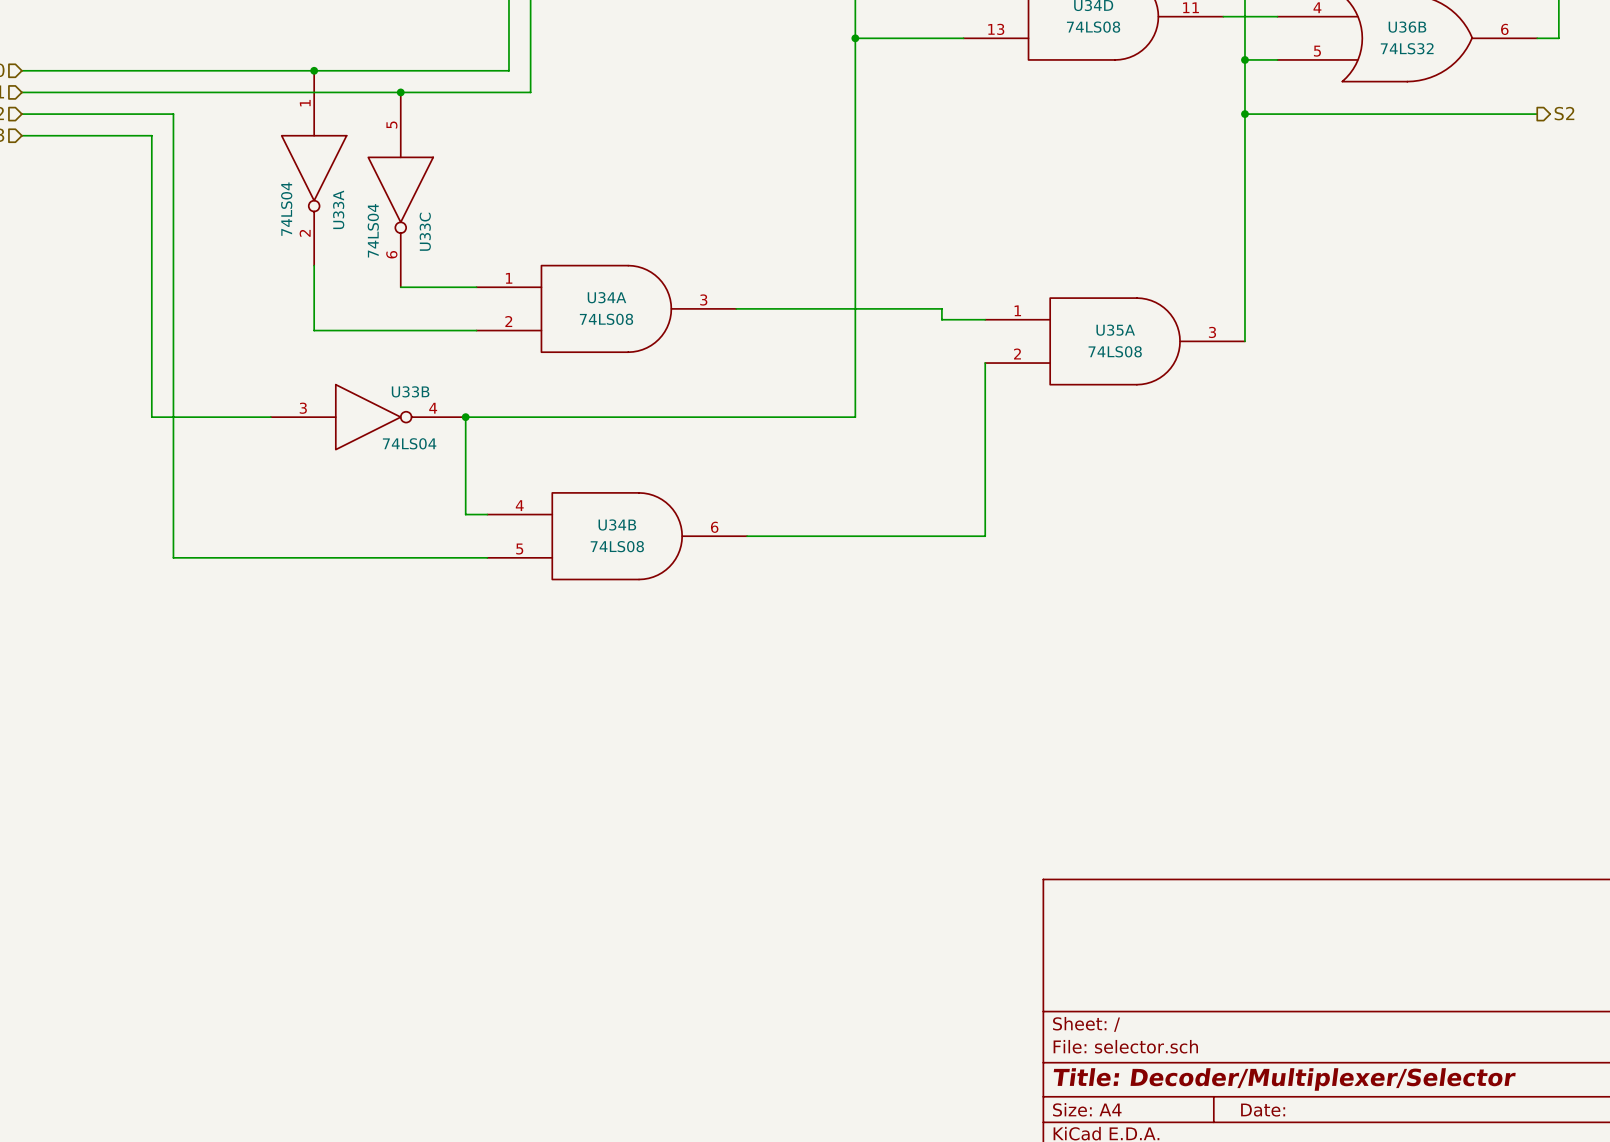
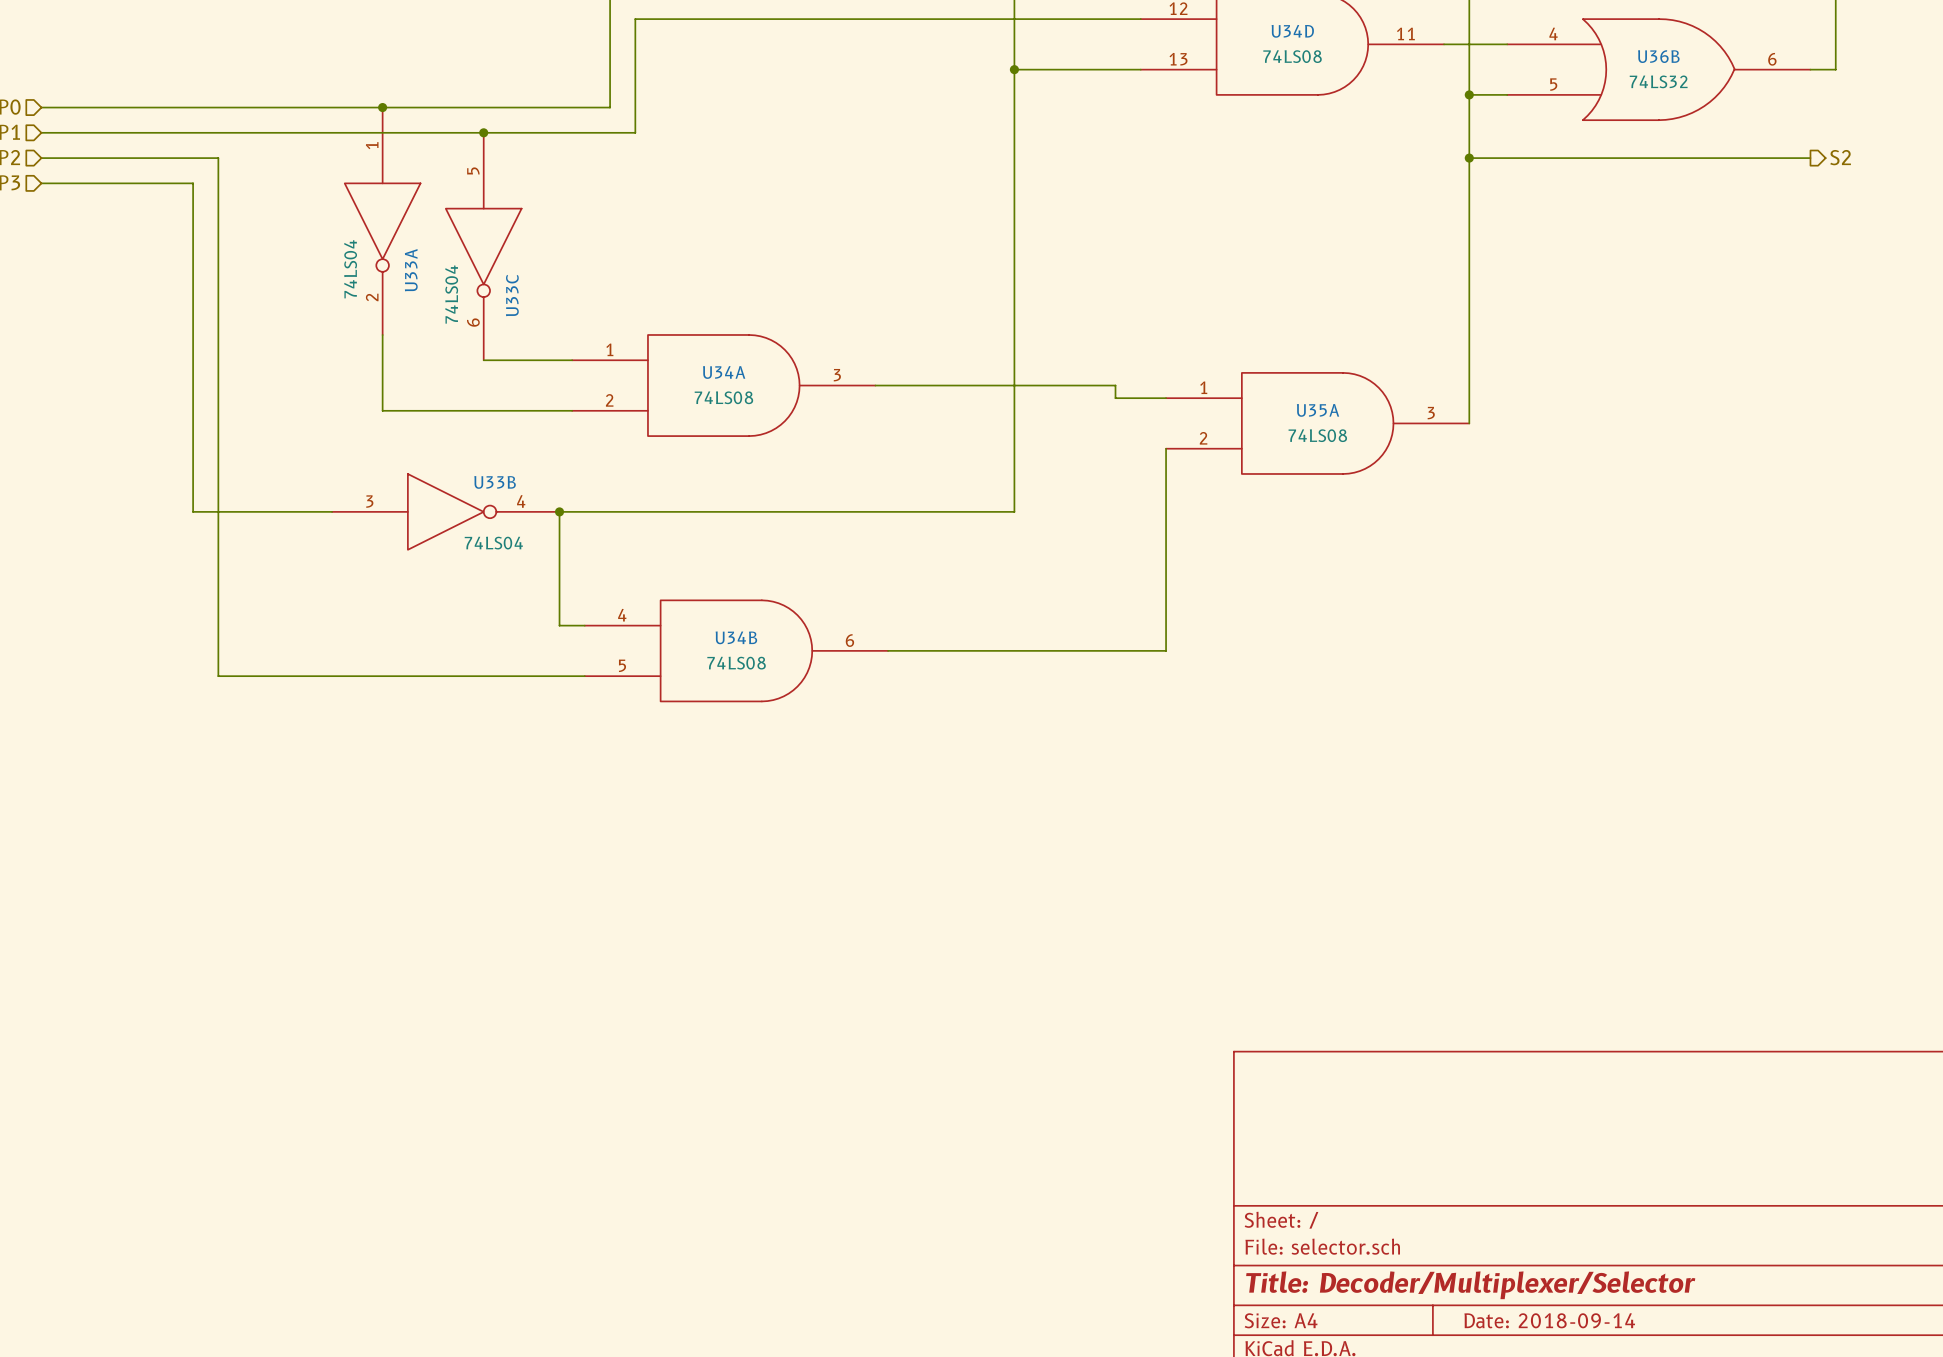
title block: Date: (1263, 1110) -> Date: 2018-09-14 (1549, 1320)

